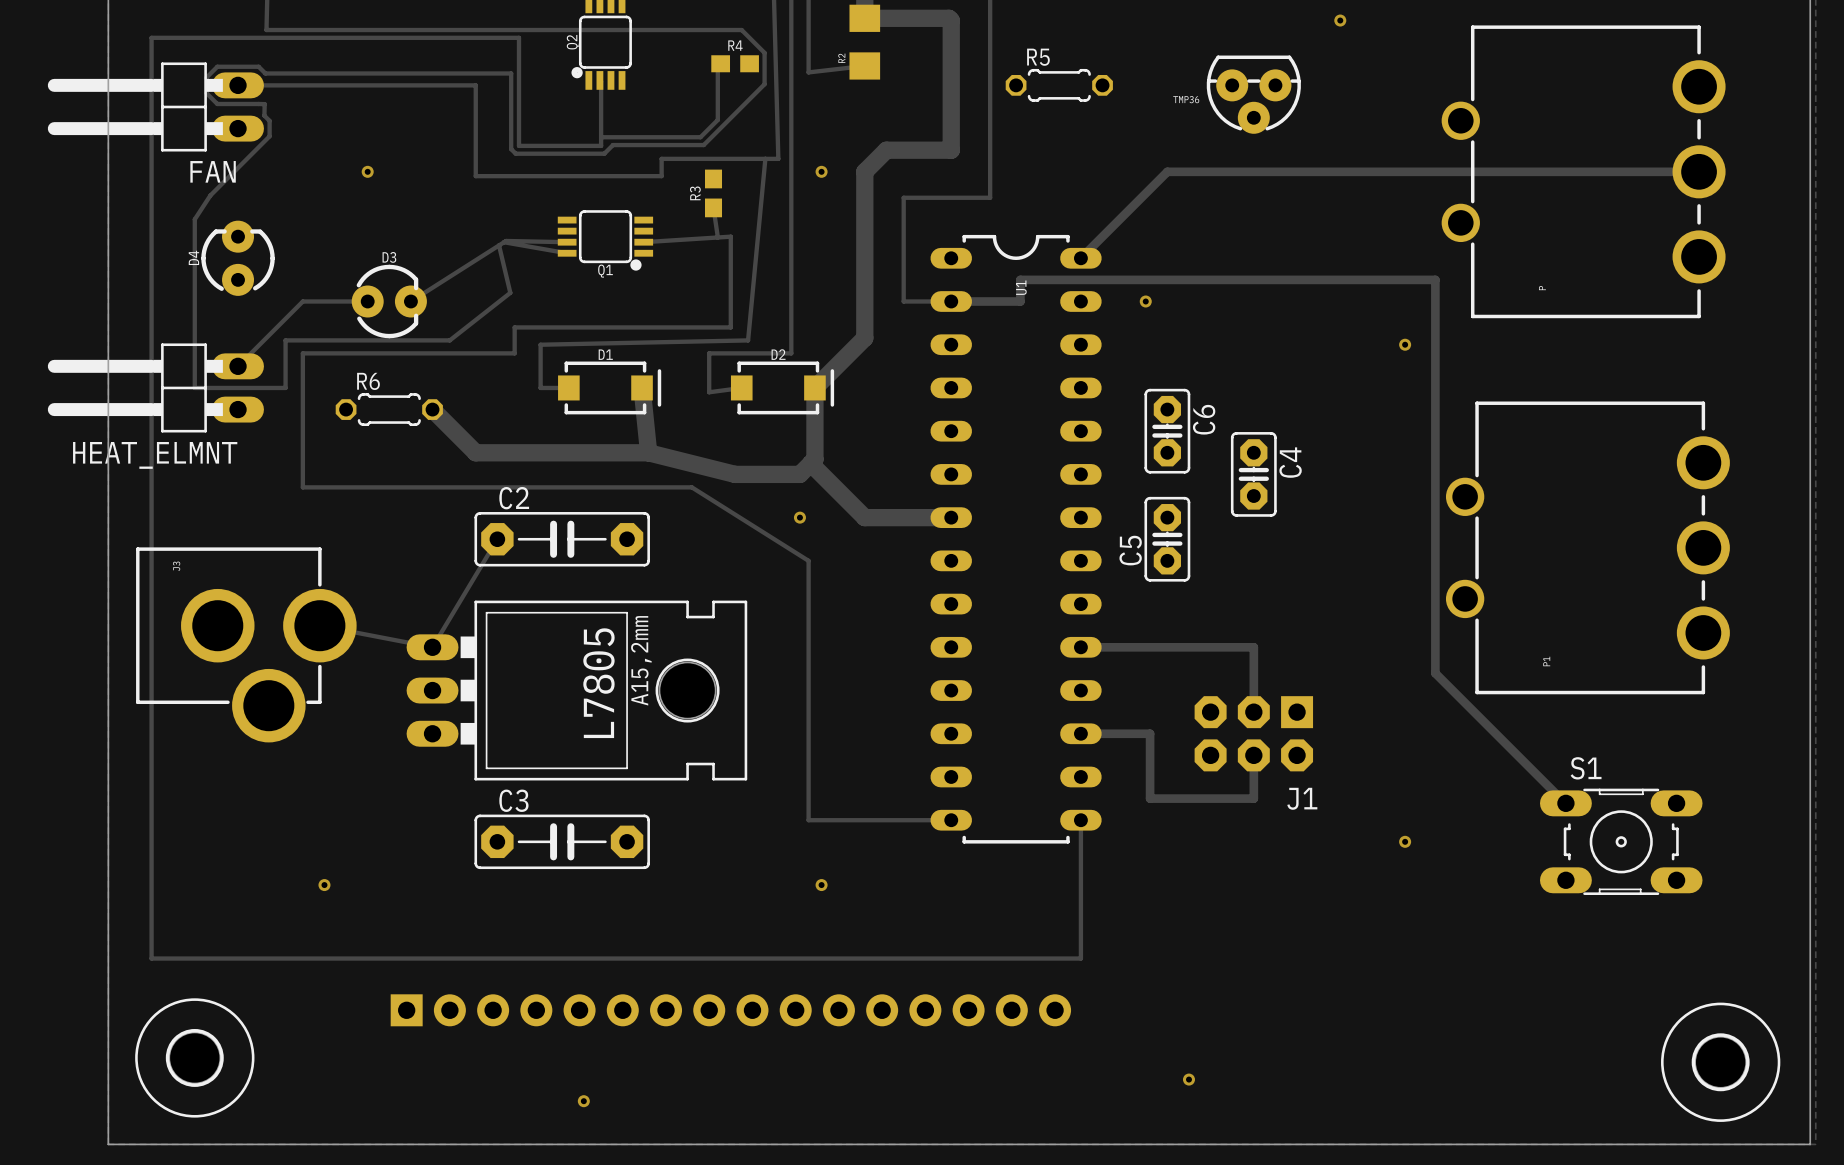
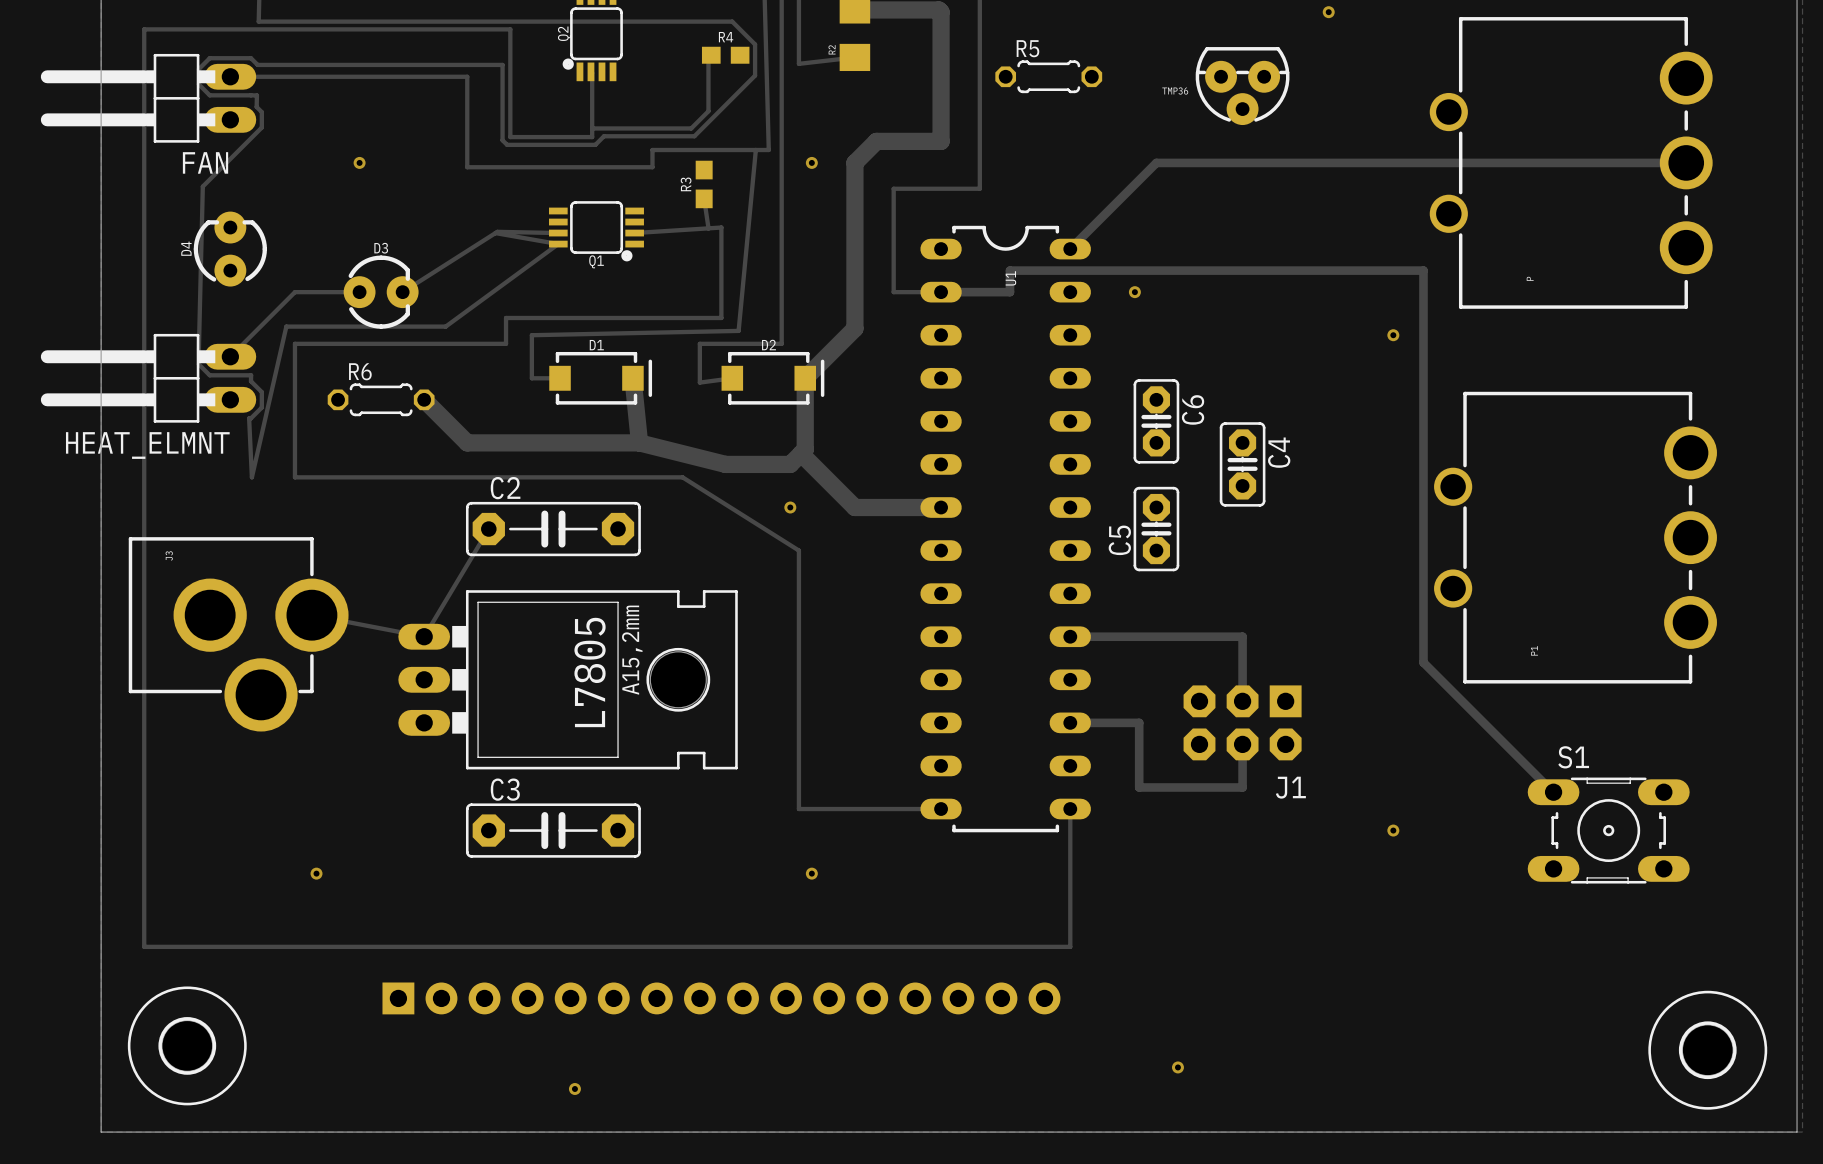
track: (210, 195) (194, 219) (194, 387) (285, 387) (285, 340) (449, 340) (510, 292) (499, 245) -> (202, 186) (198, 364) (209, 375) (251, 375) (250, 381) (261, 392) (261, 407) (249, 418) (251, 477) (286, 326) (445, 326) (558, 244)

